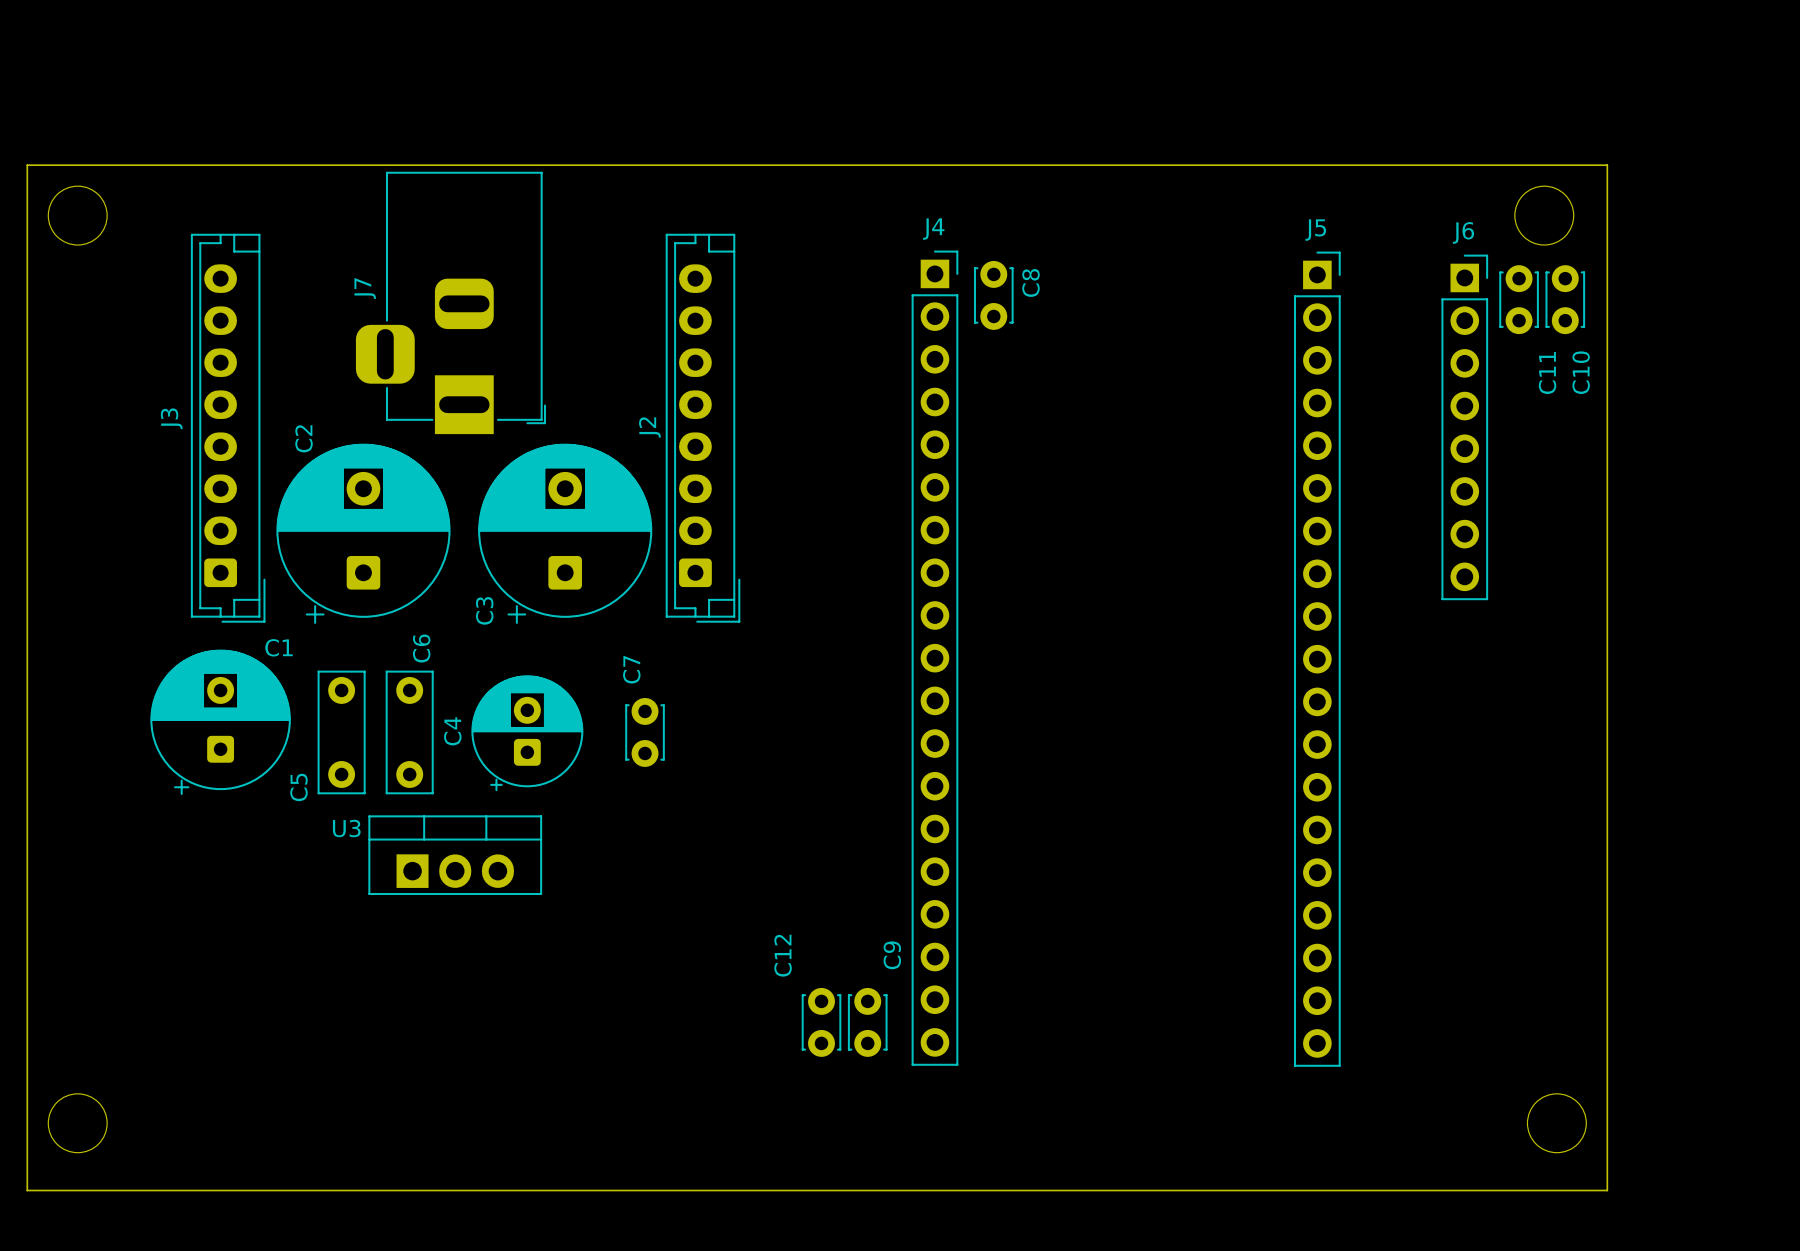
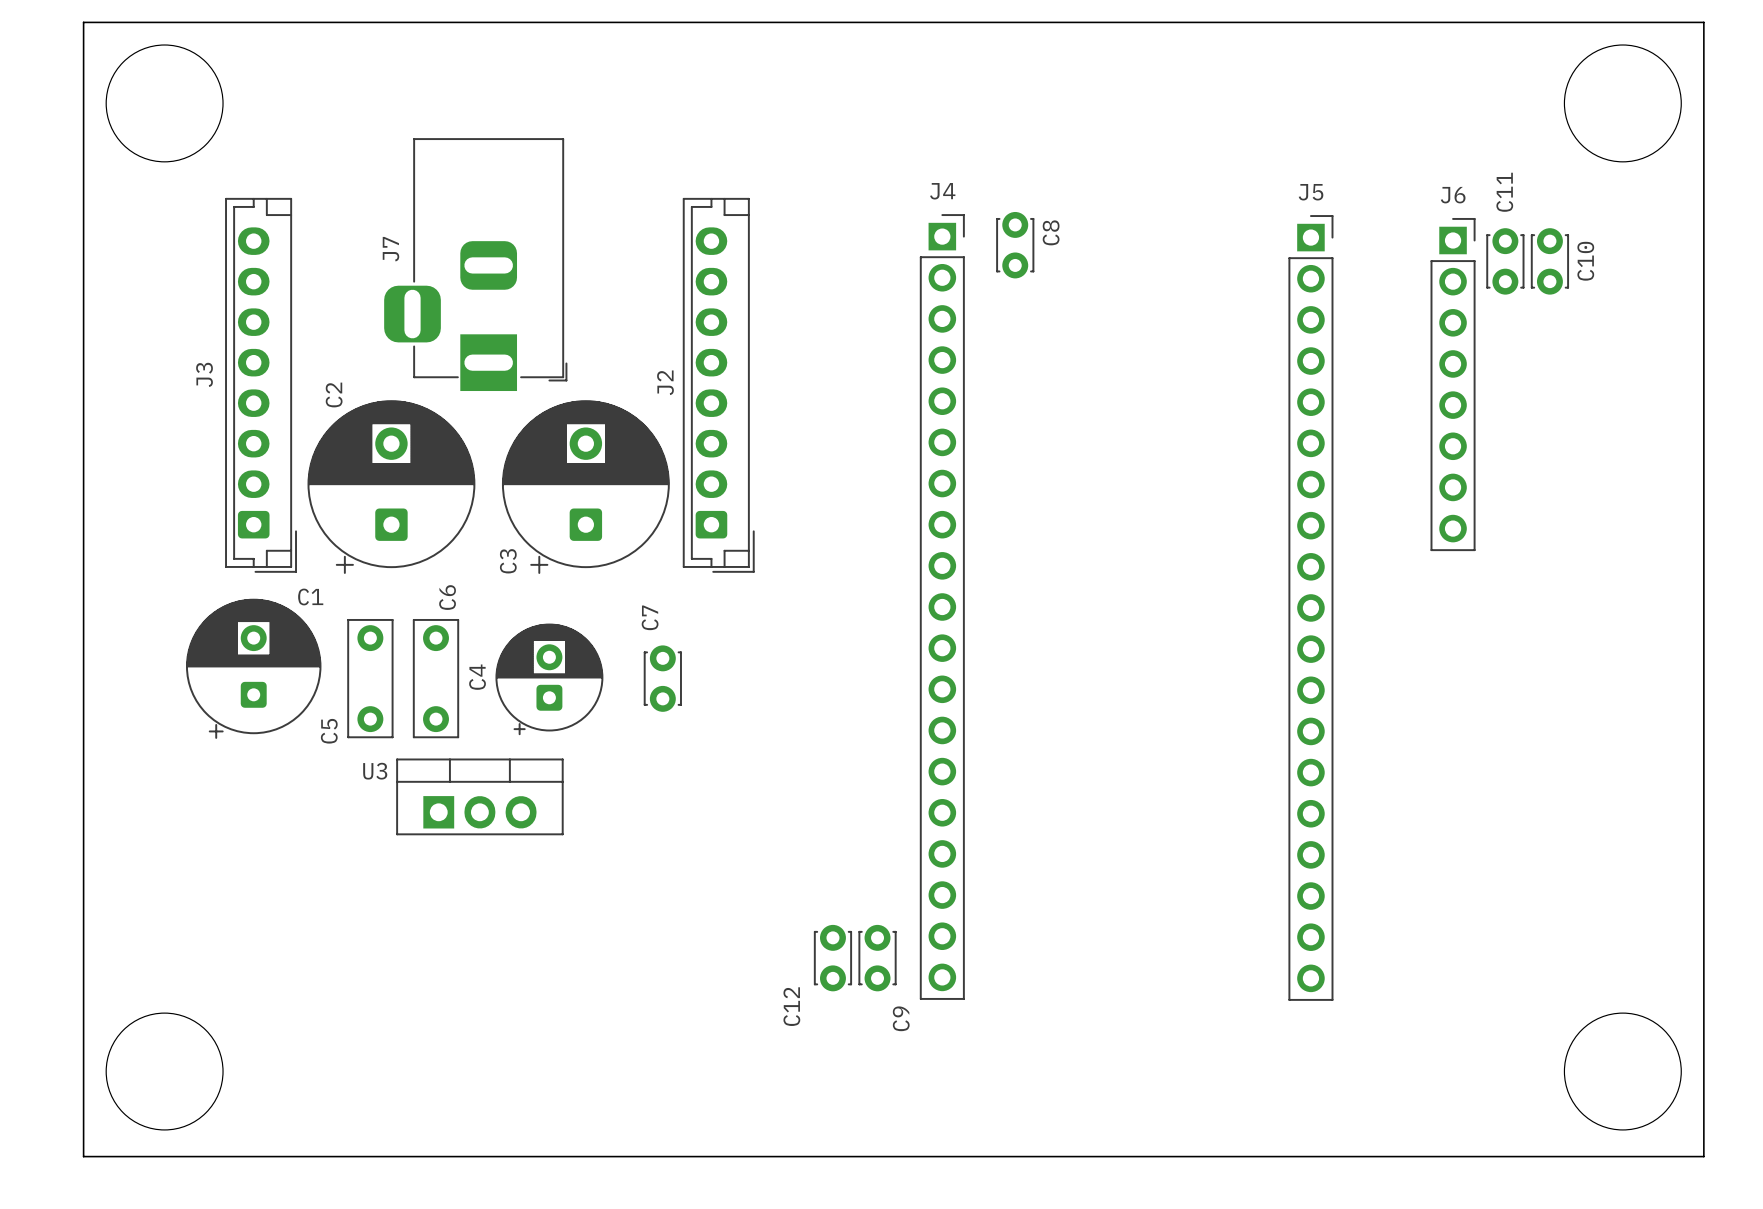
round board edge: none -> [105, 44, 224, 163]
round board edge: none -> [1564, 44, 1682, 163]
board edge: (27, 165) (1607, 165) (1607, 1190) (27, 1190) (27, 165) -> (83, 22) (83, 1156) (1703, 1156) (1703, 22) (83, 22)
round board edge: [47, 185, 108, 246] -> none
round board edge: [1514, 185, 1575, 246] -> none
C8 position: (993, 295) -> (1015, 245)
C10 name position: C10 (1581, 372) -> C10 (1585, 261)
C11 name position: C11 (1547, 373) -> C11 (1504, 192)
C12 name position: C12 (783, 955) -> C12 (791, 1006)
C9 name position: C9 (892, 955) -> C9 (901, 1018)
round board edge: none -> [105, 1012, 224, 1131]
round board edge: none -> [1564, 1012, 1682, 1131]
round board edge: [47, 1093, 108, 1154] -> none
round board edge: [1527, 1093, 1587, 1154] -> none

